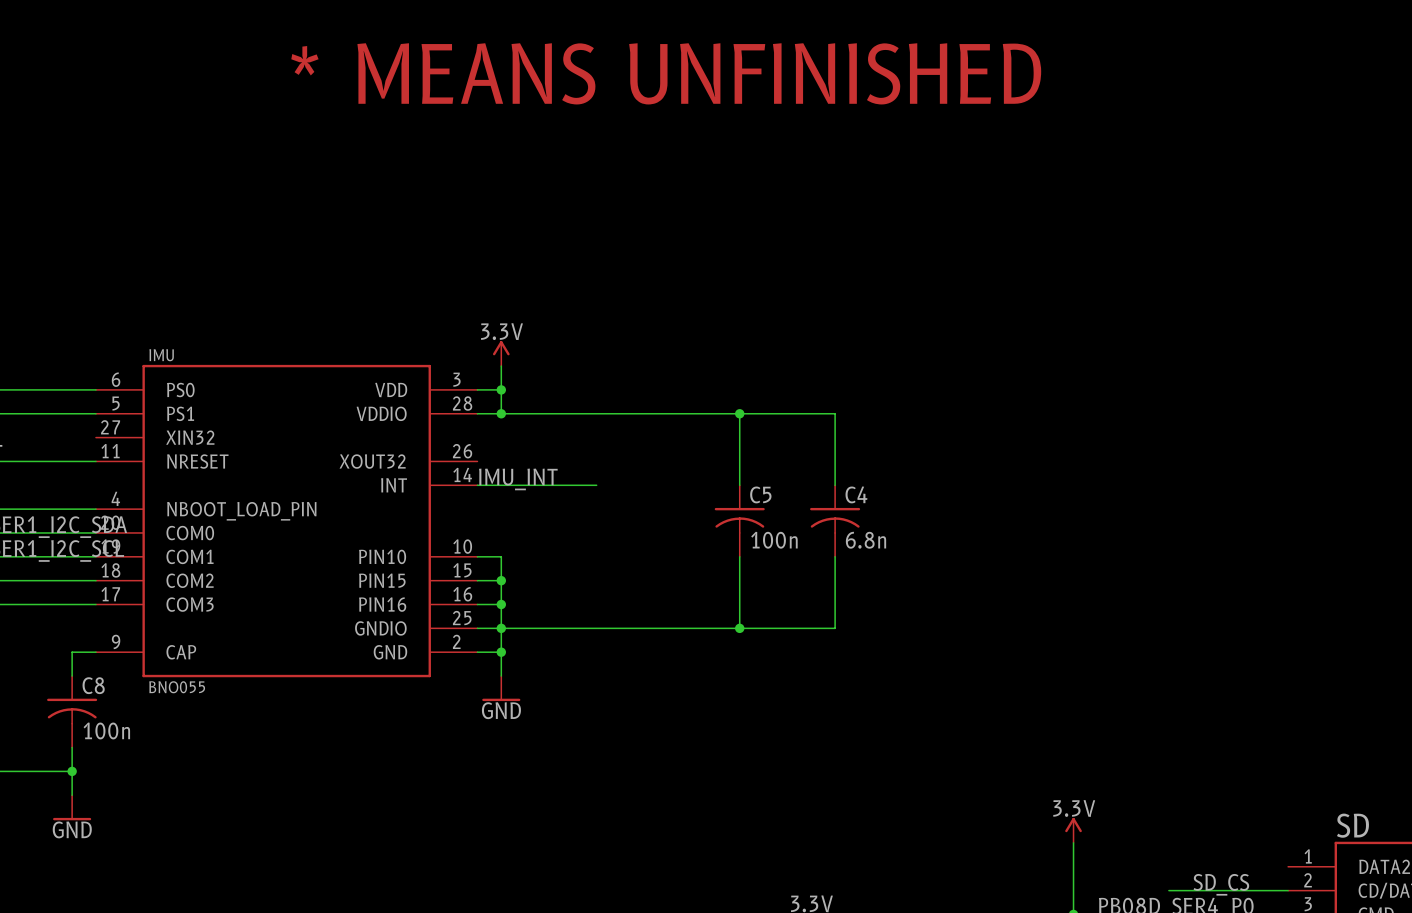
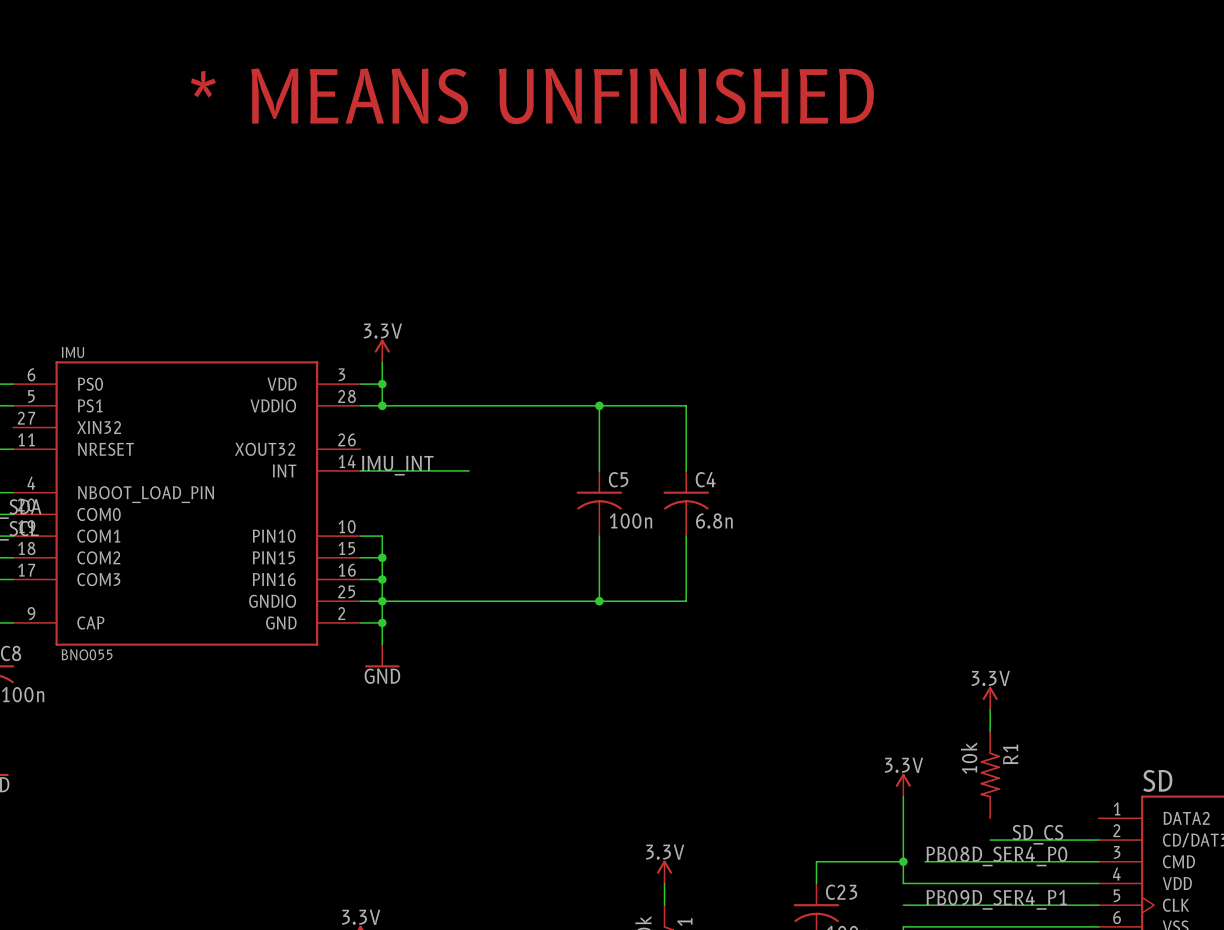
power symbol: none -> 3.3V (990, 698)
wire: none -> (990, 709) (990, 731)
R1: none -> 10k (990, 774)

